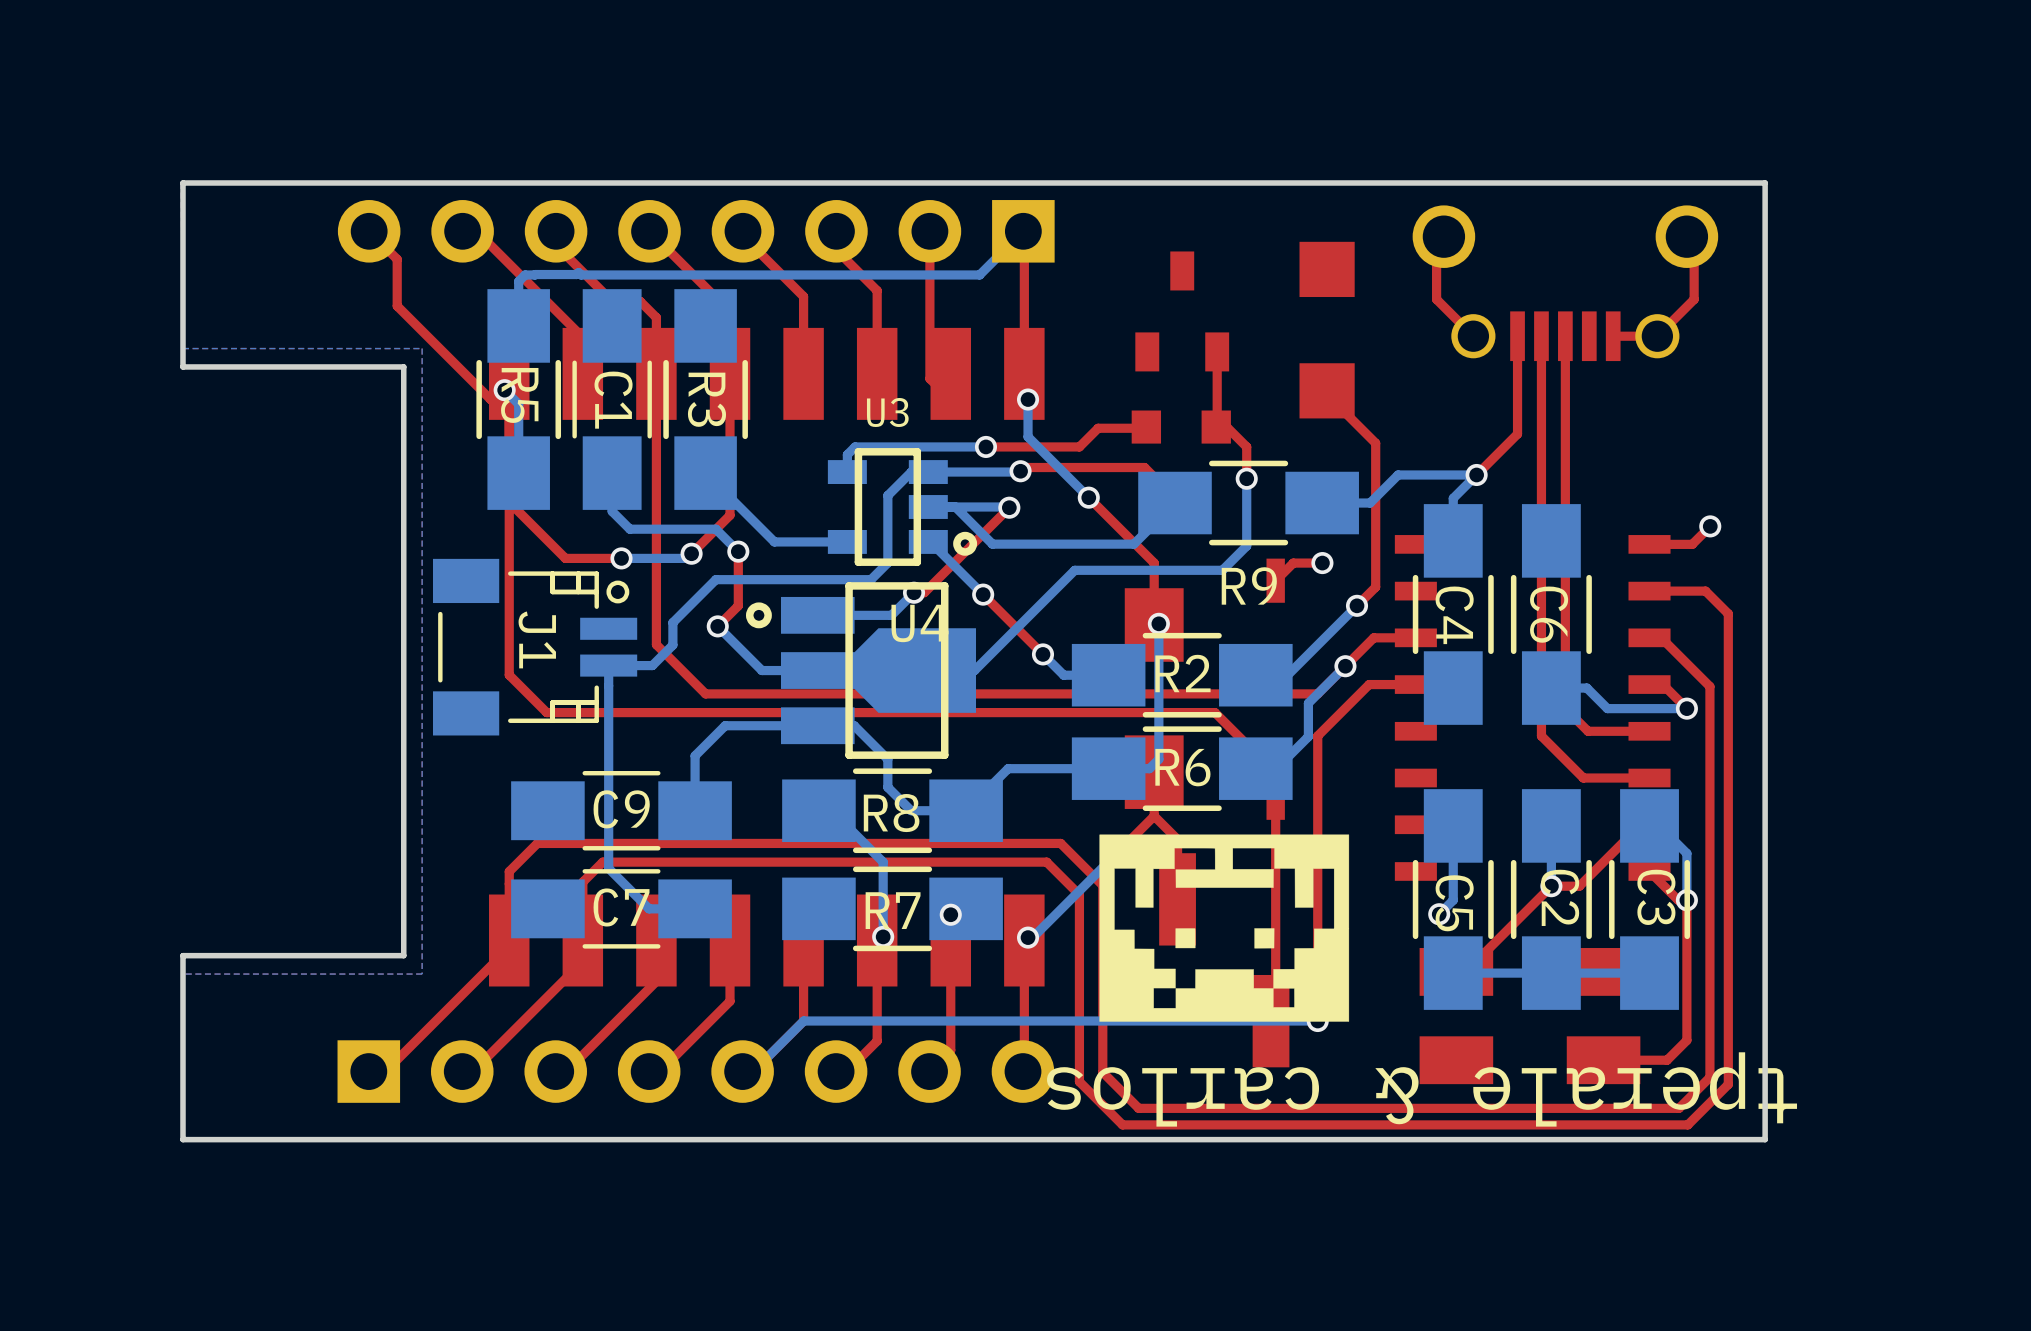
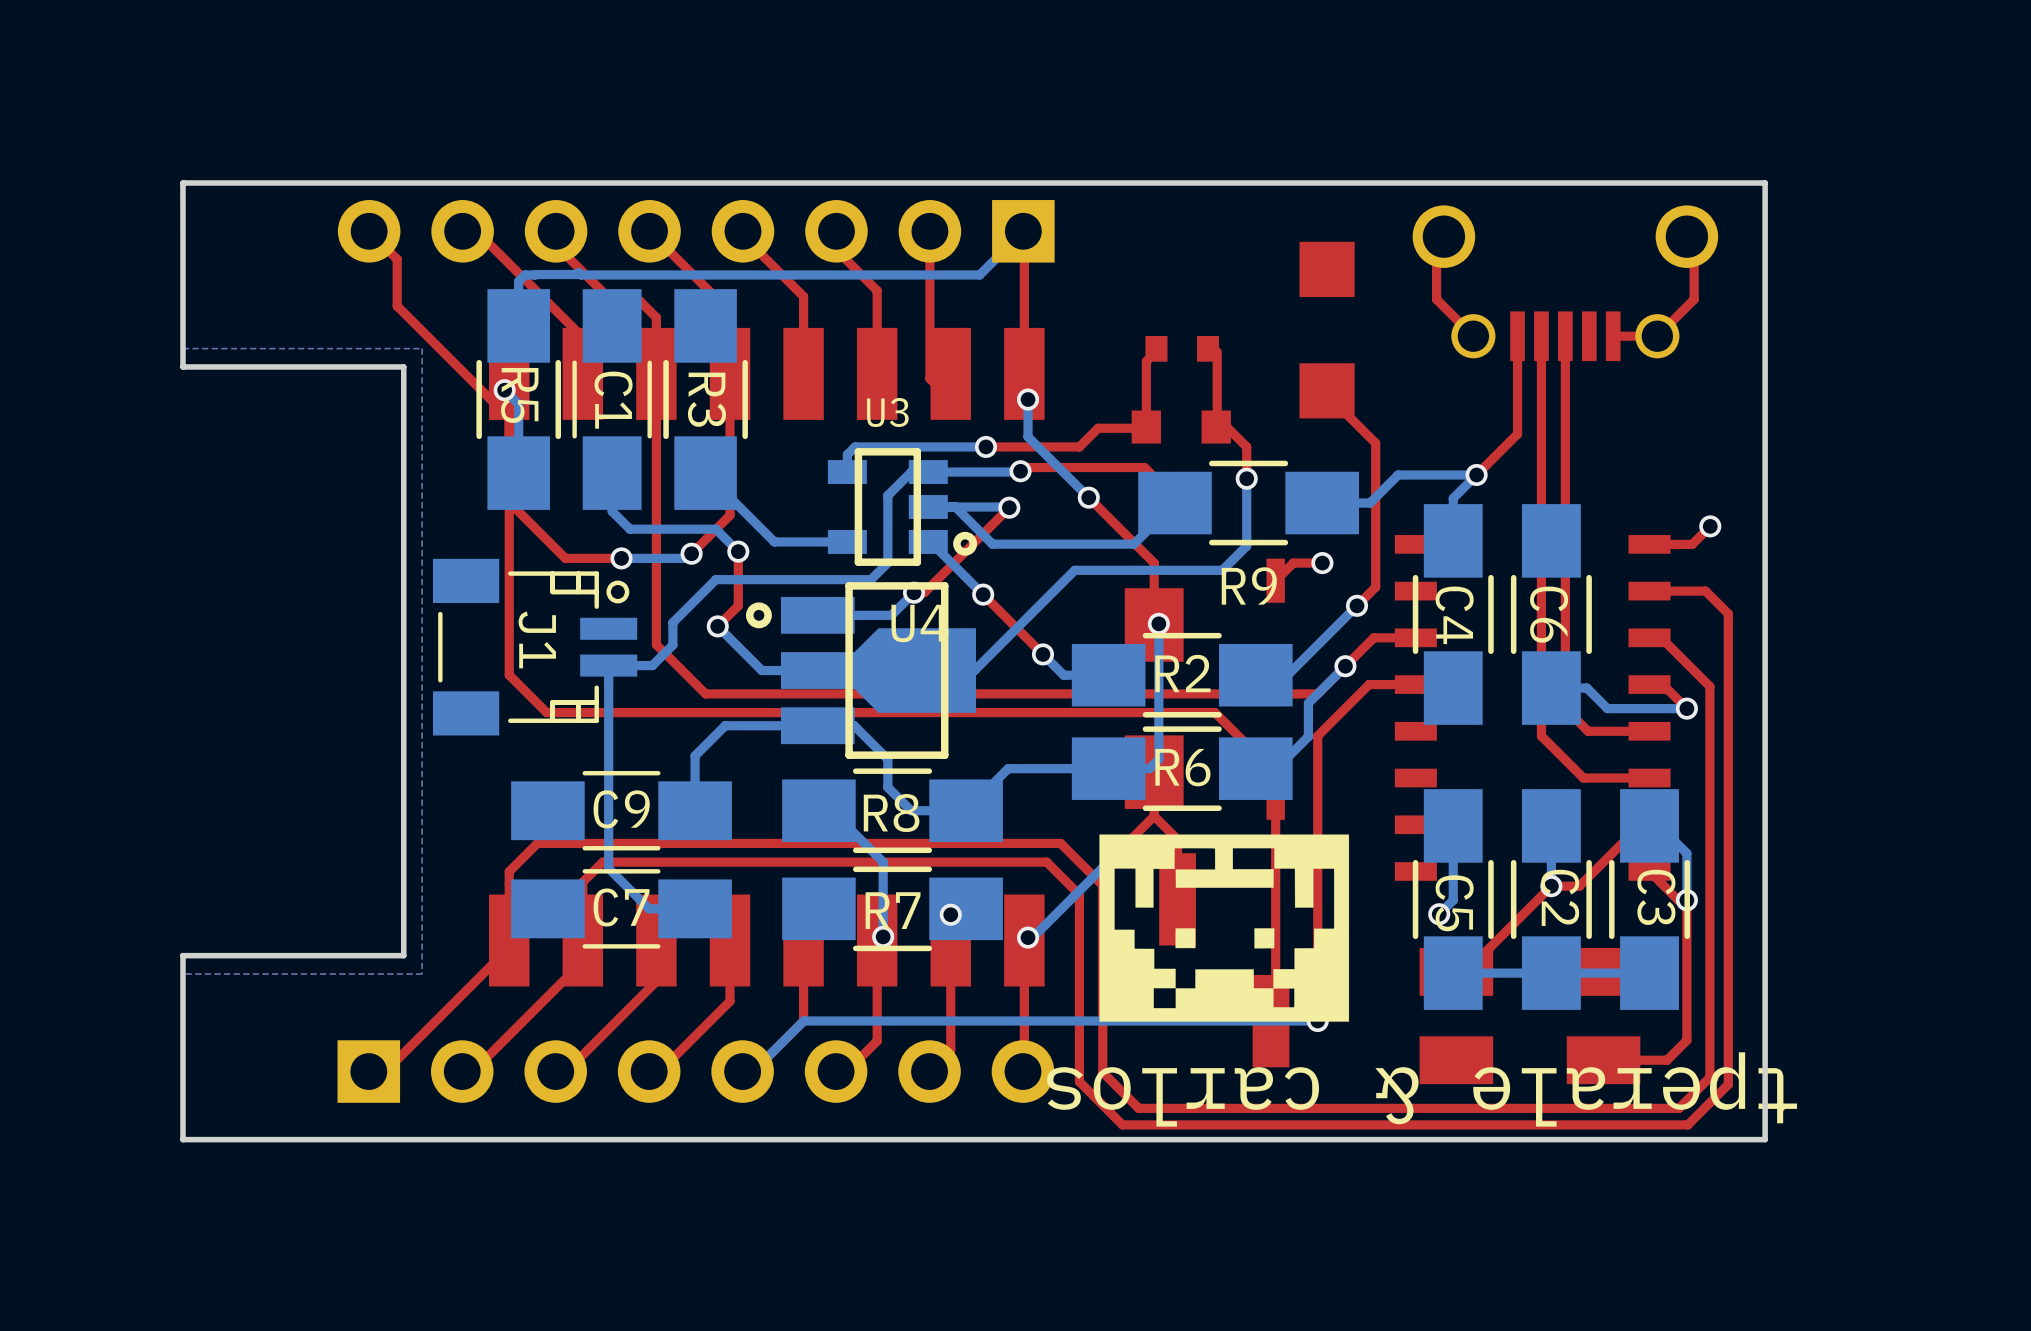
part: (1182, 311) -> none
top track: none -> (1156, 348) (1156, 351) (1146, 361) (1146, 427)
part: none -> (1182, 348)

